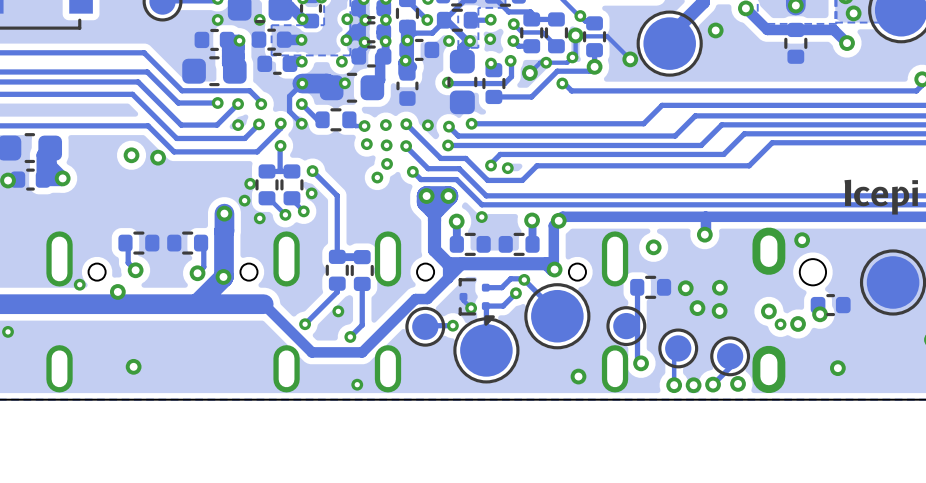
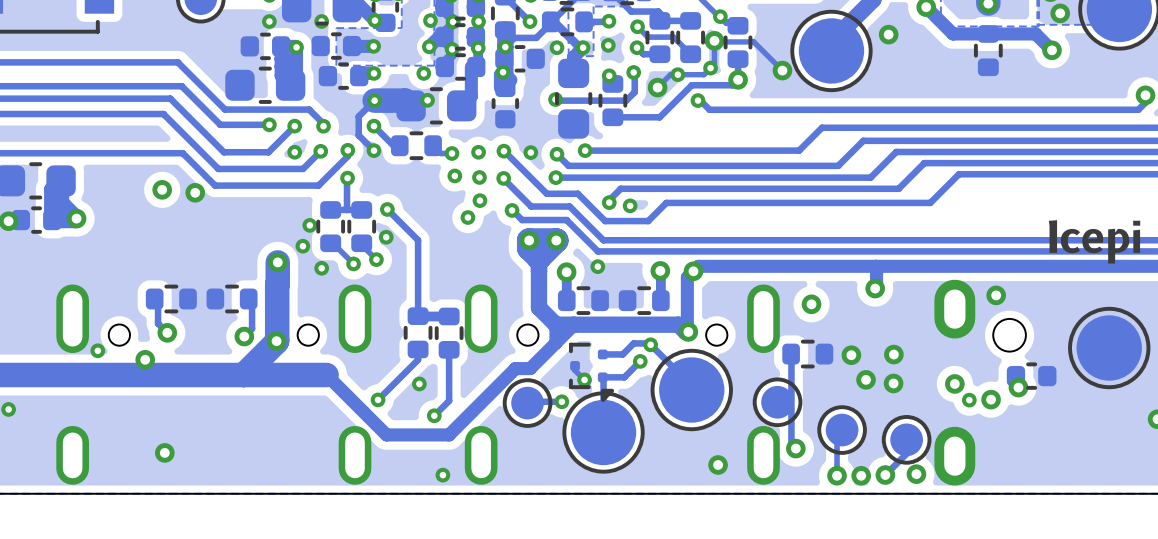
via: (837, 368) -> none

